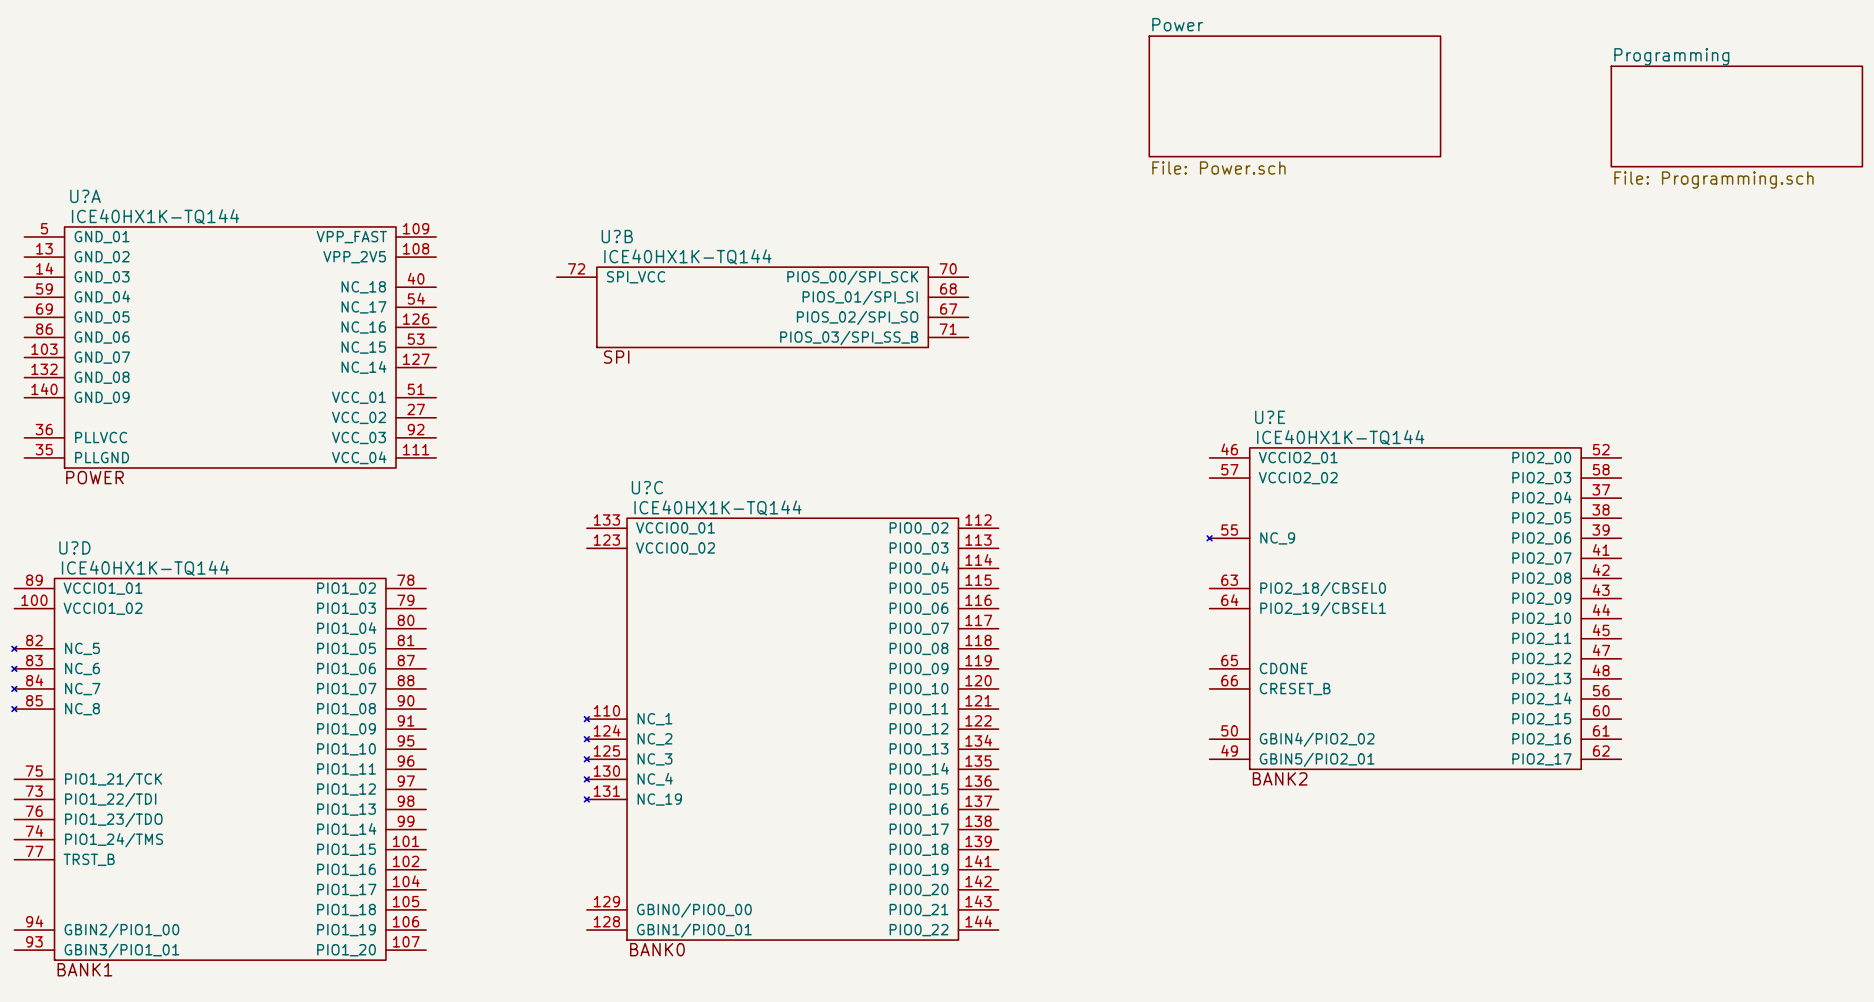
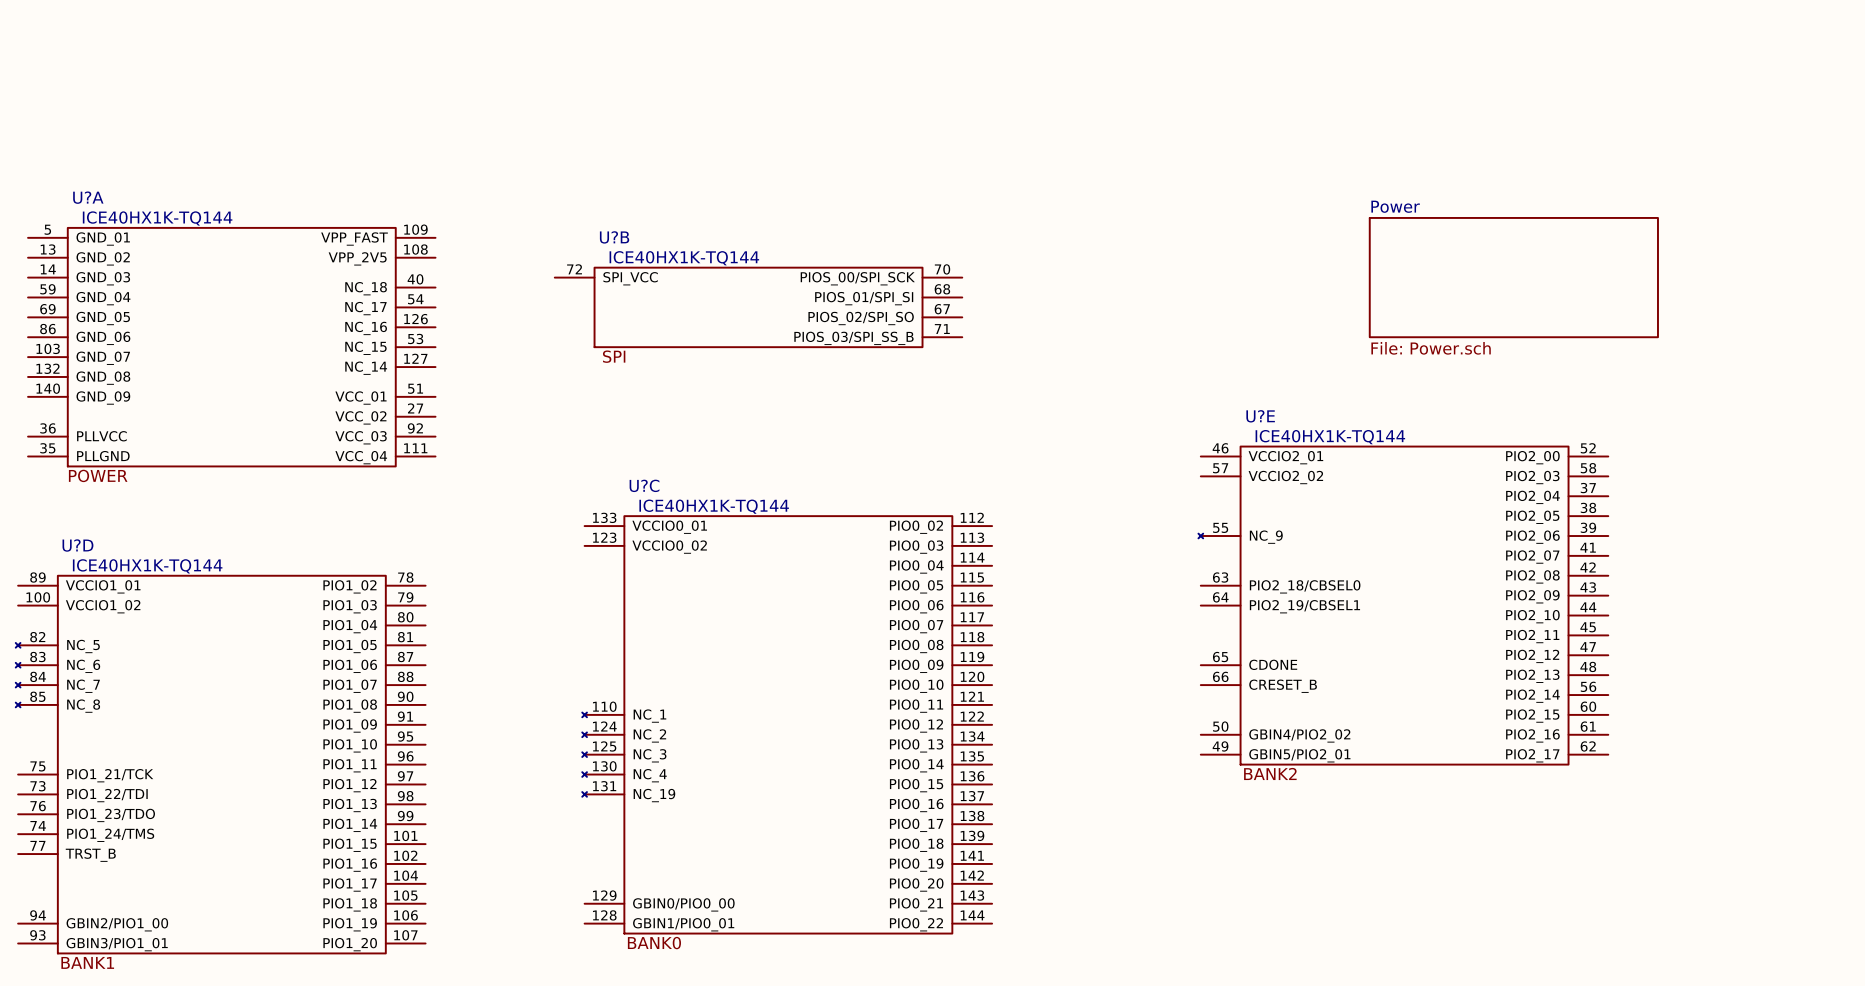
sheet Power: File: Power.sch (1294, 96) -> none
sheet Programming: File: Programming.sch (1736, 116) -> none
sheet Power: none -> File: Power.sch (1513, 277)

